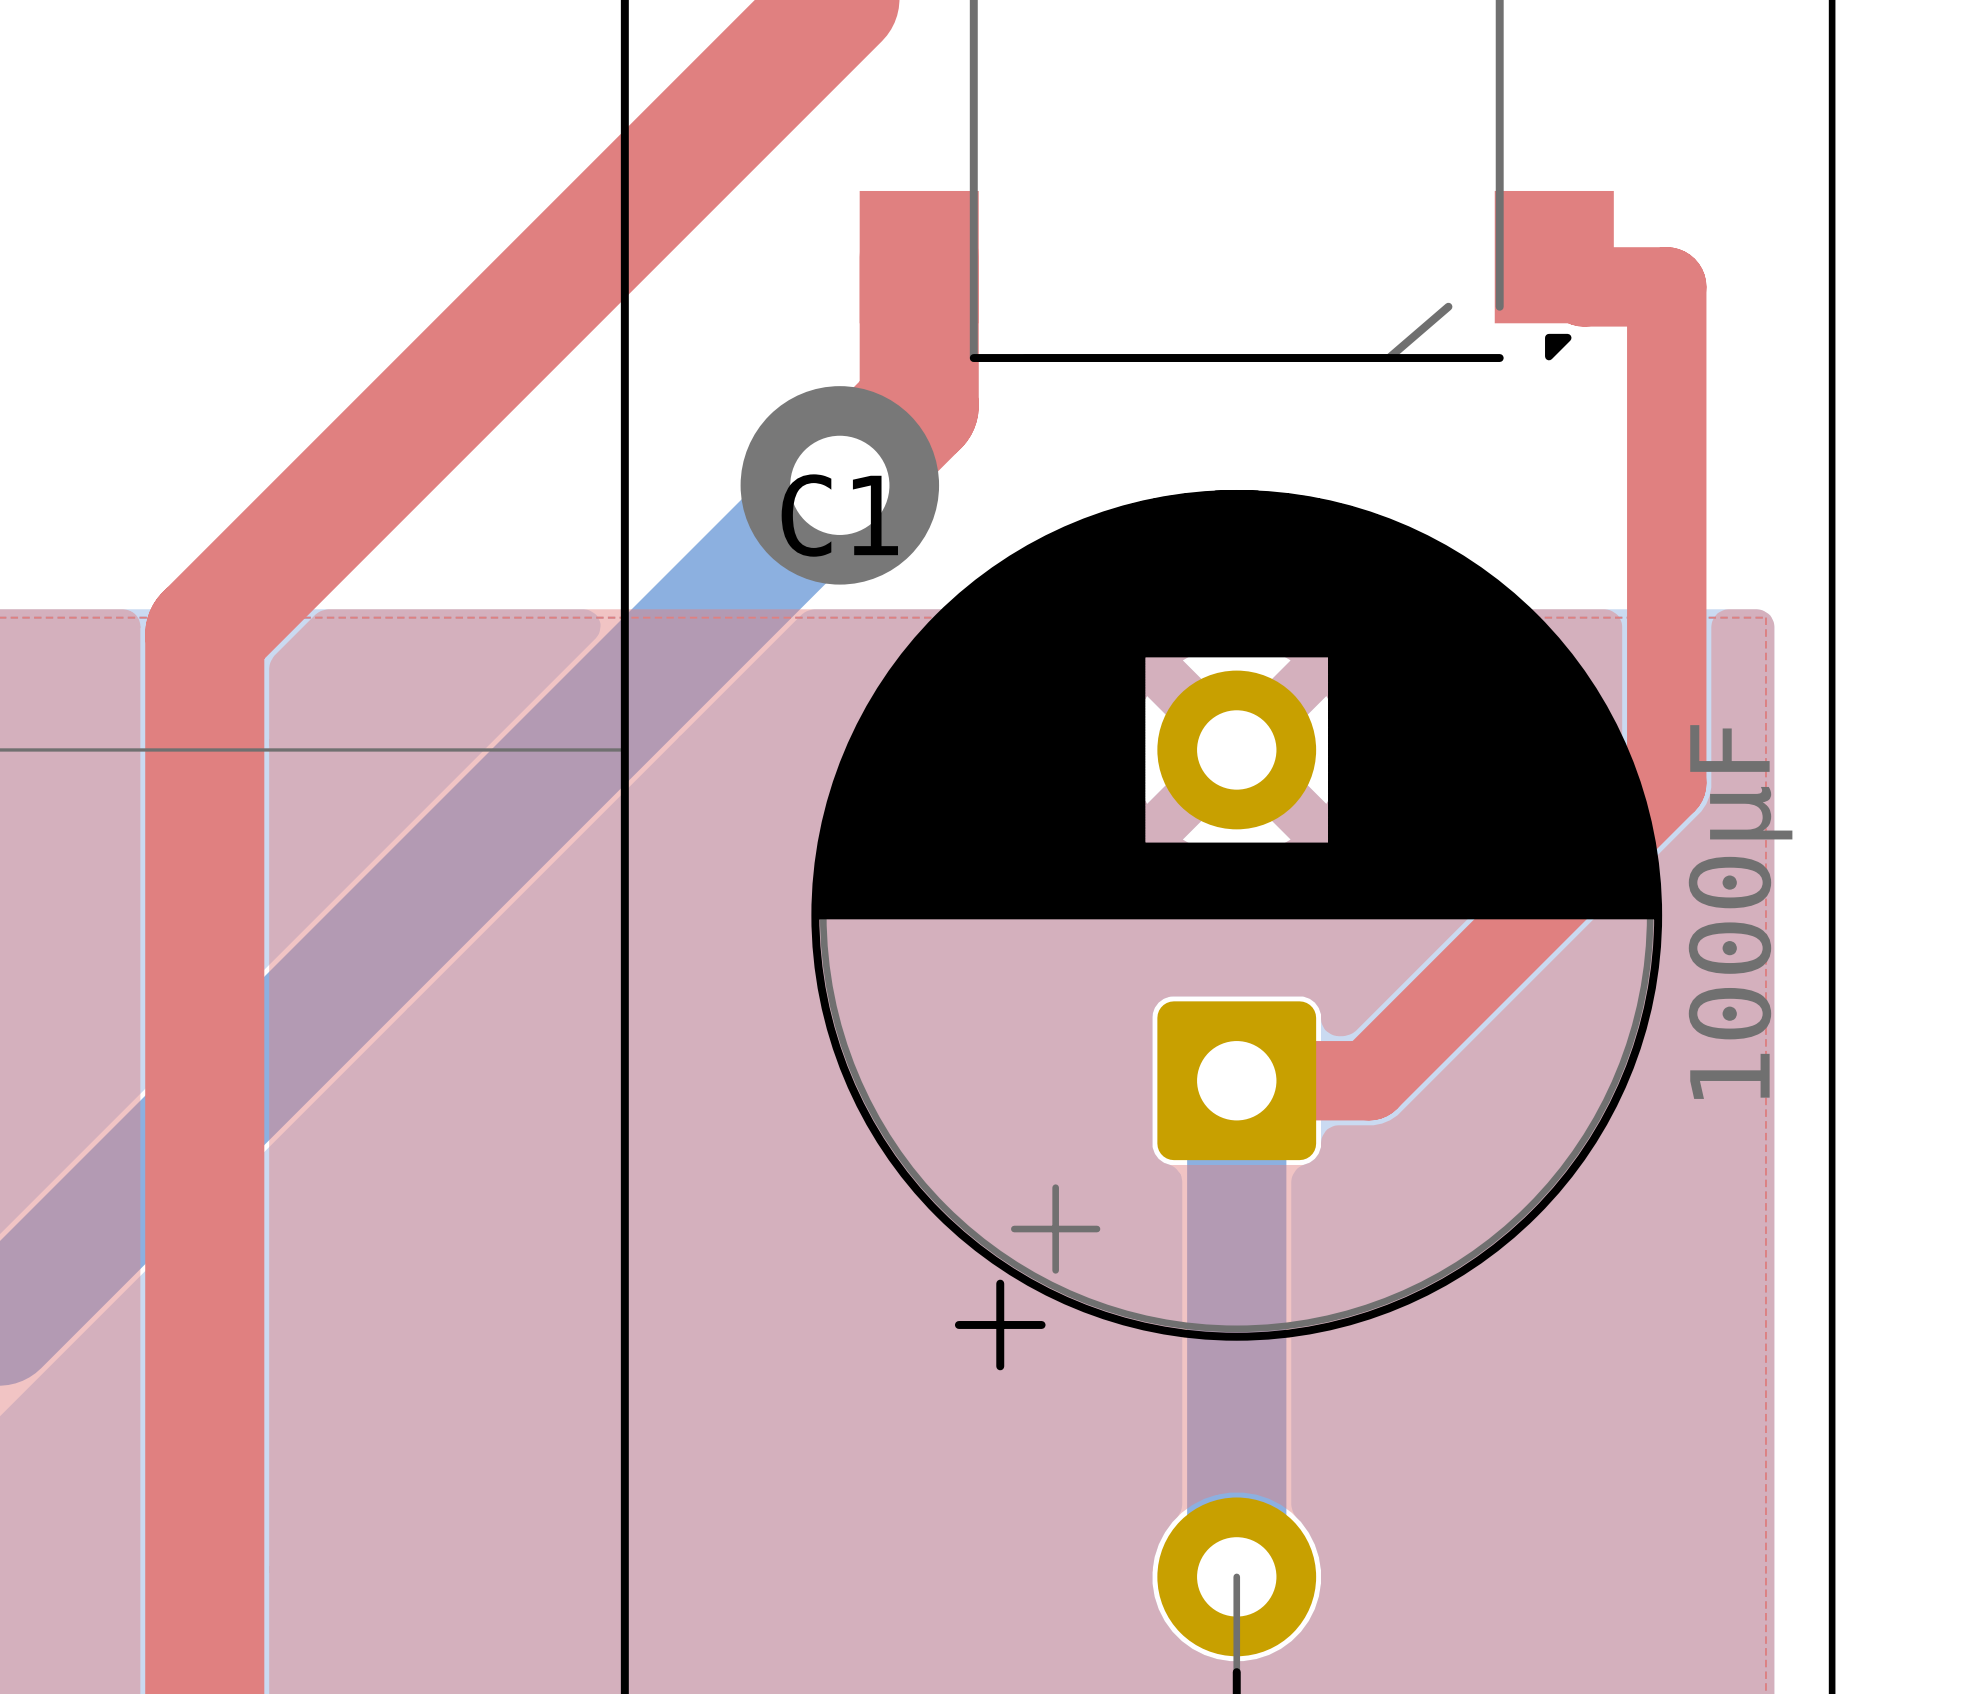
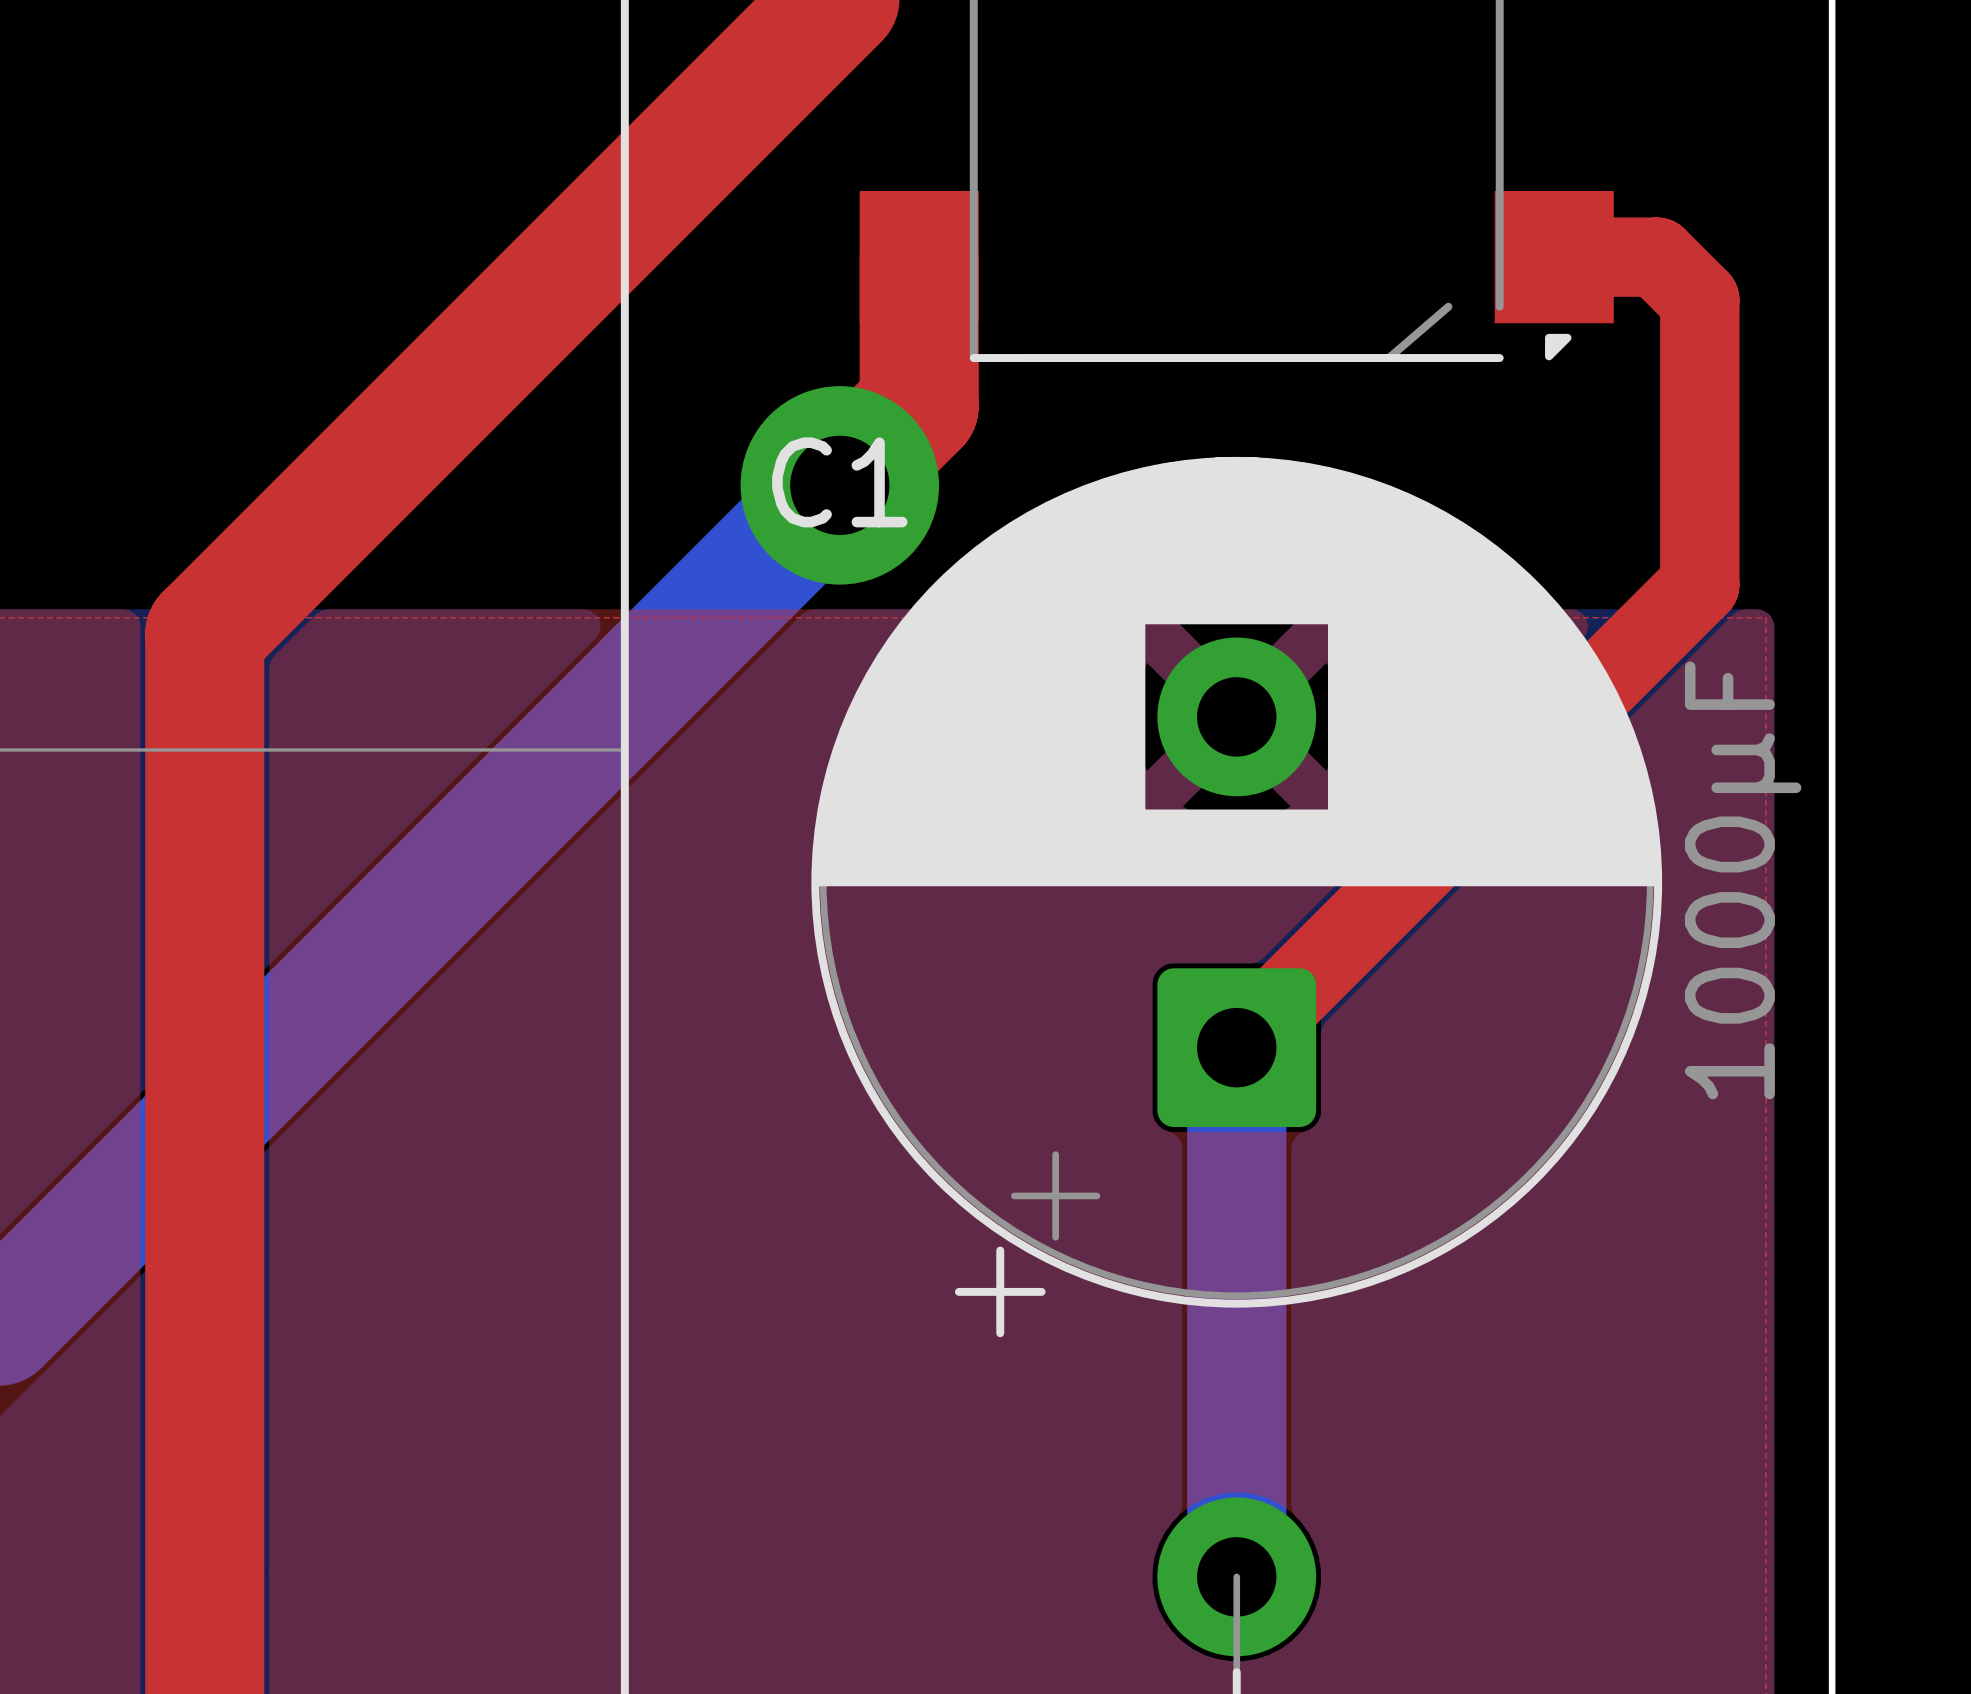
top track: (1554, 257) (1584, 286) (1666, 286) (1666, 783) (1369, 1080) (1236, 1080) -> (1554, 257) (1656, 257) (1699, 300) (1699, 584) (1236, 1047)
C1 position: (1236, 930) -> (1236, 897)

